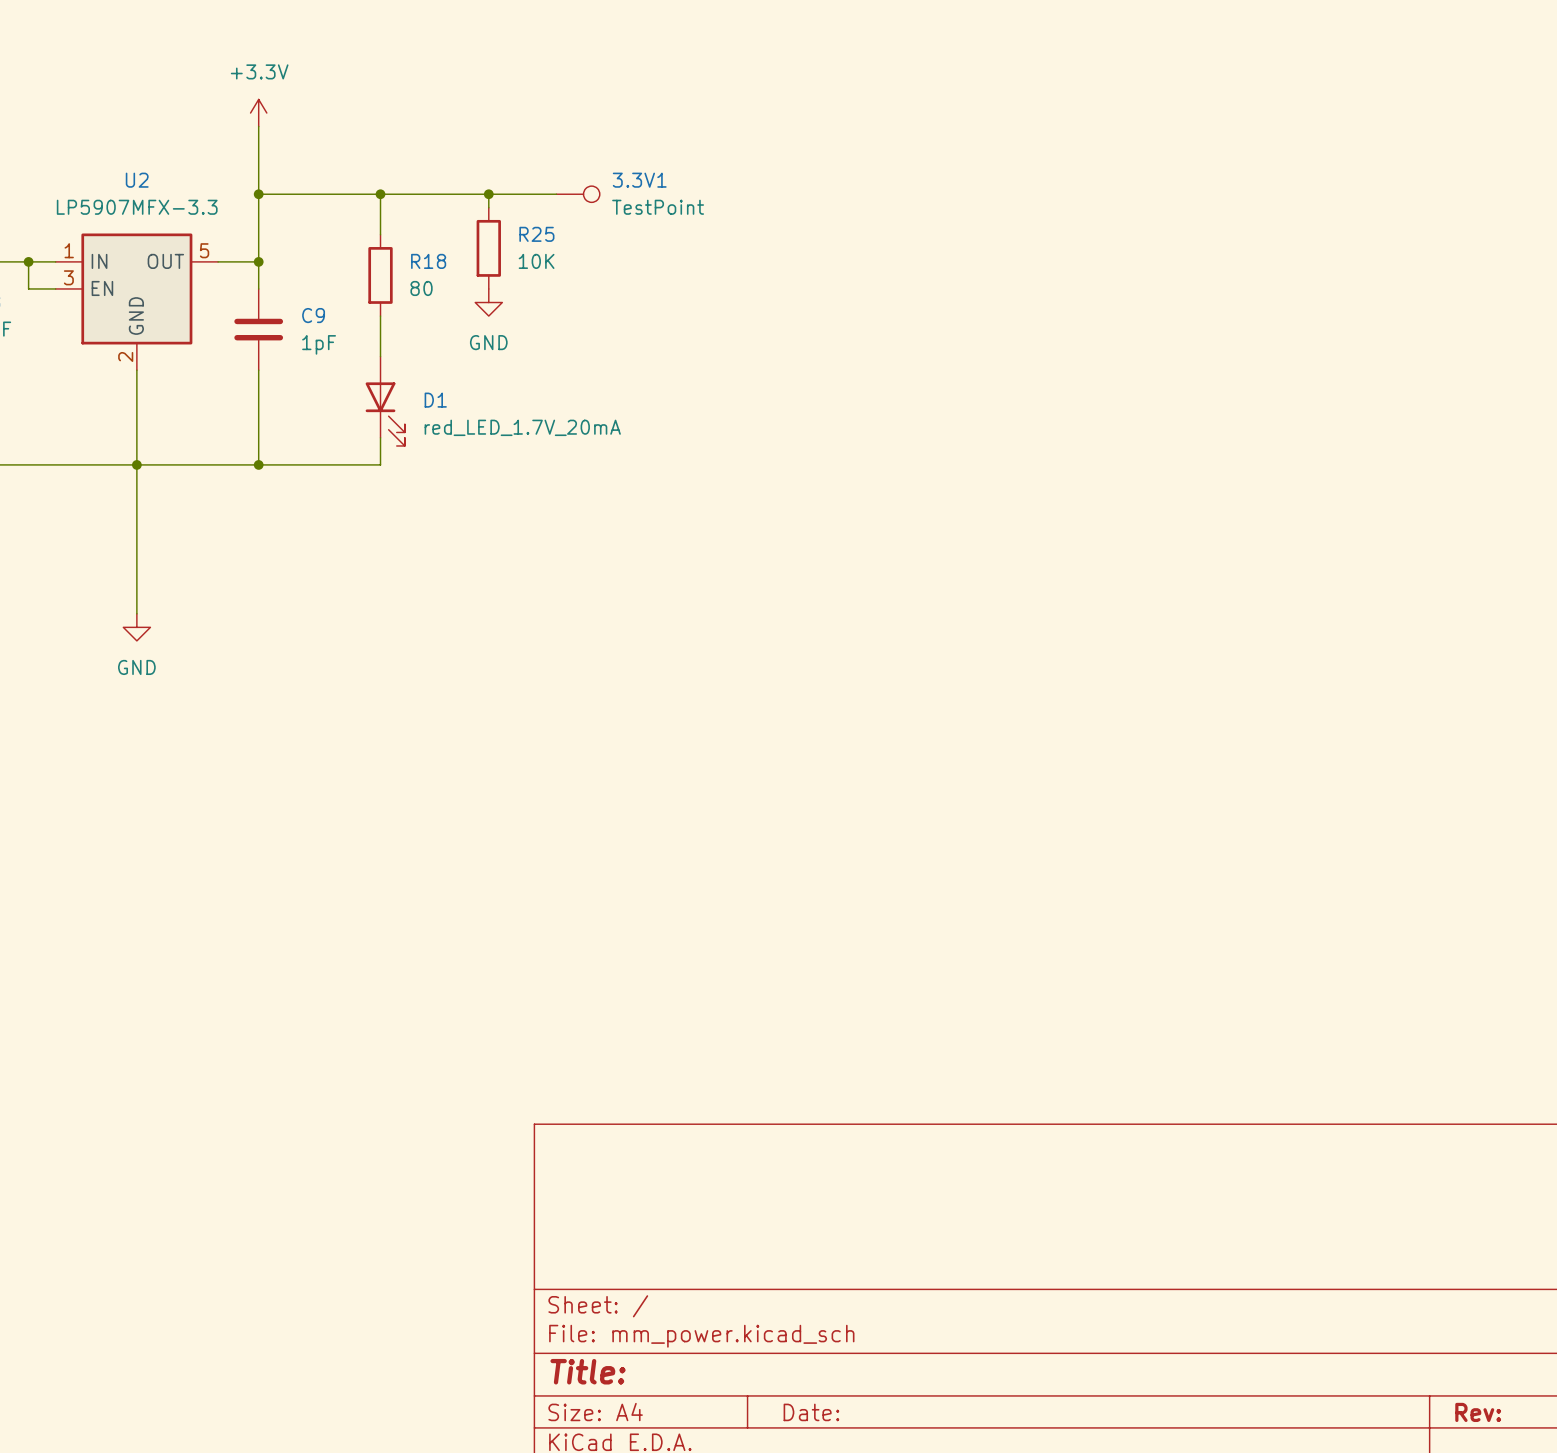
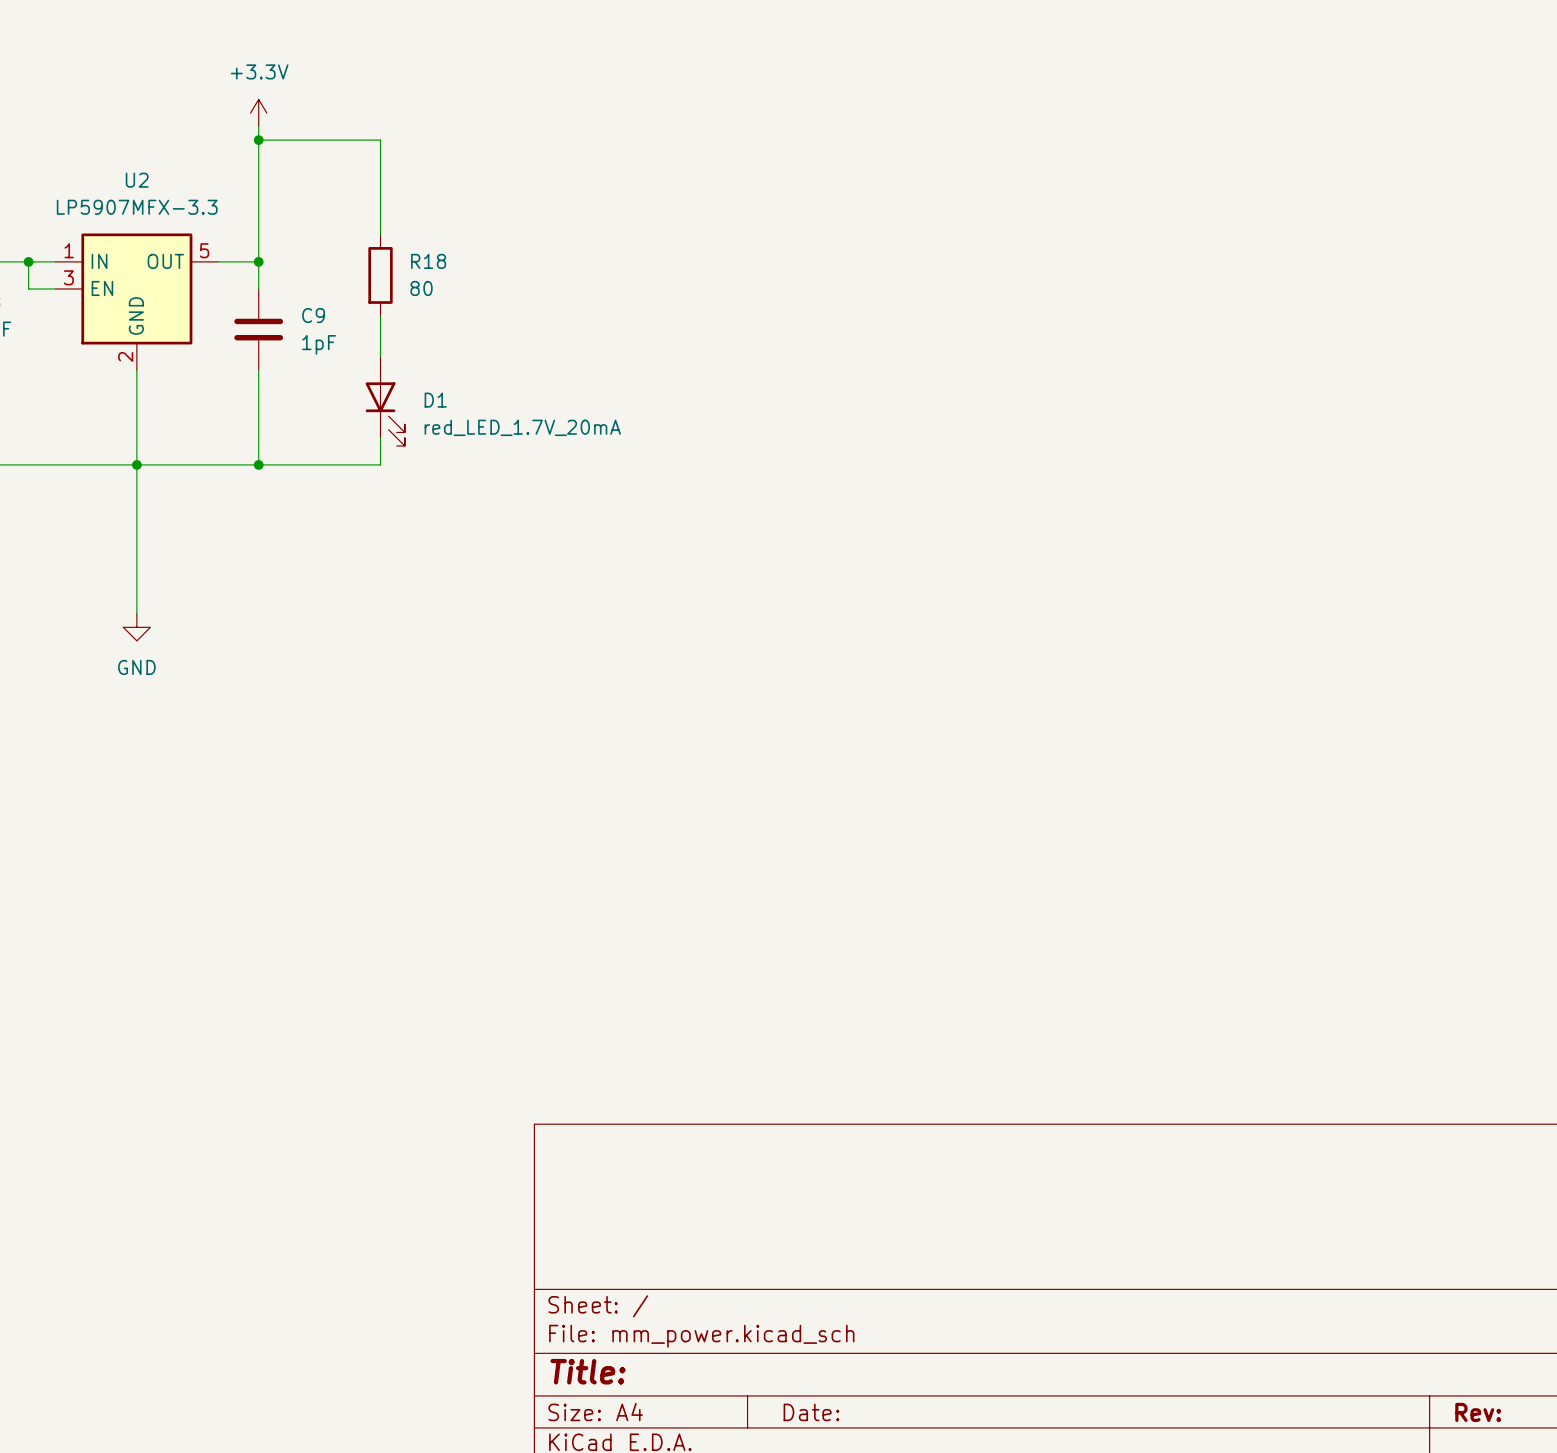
wire: none -> (258, 140) (380, 140) (380, 194)
wire: (258, 194) (556, 194) -> none
junction position: (258, 194) -> (258, 140)
junction: (380, 194) -> none
wire: (488, 194) (488, 207) -> none
junction: (488, 194) -> none
3.3V1: TestPoint (578, 194) -> none
R25: 10K (488, 248) -> none
power symbol: GND (488, 302) -> none

